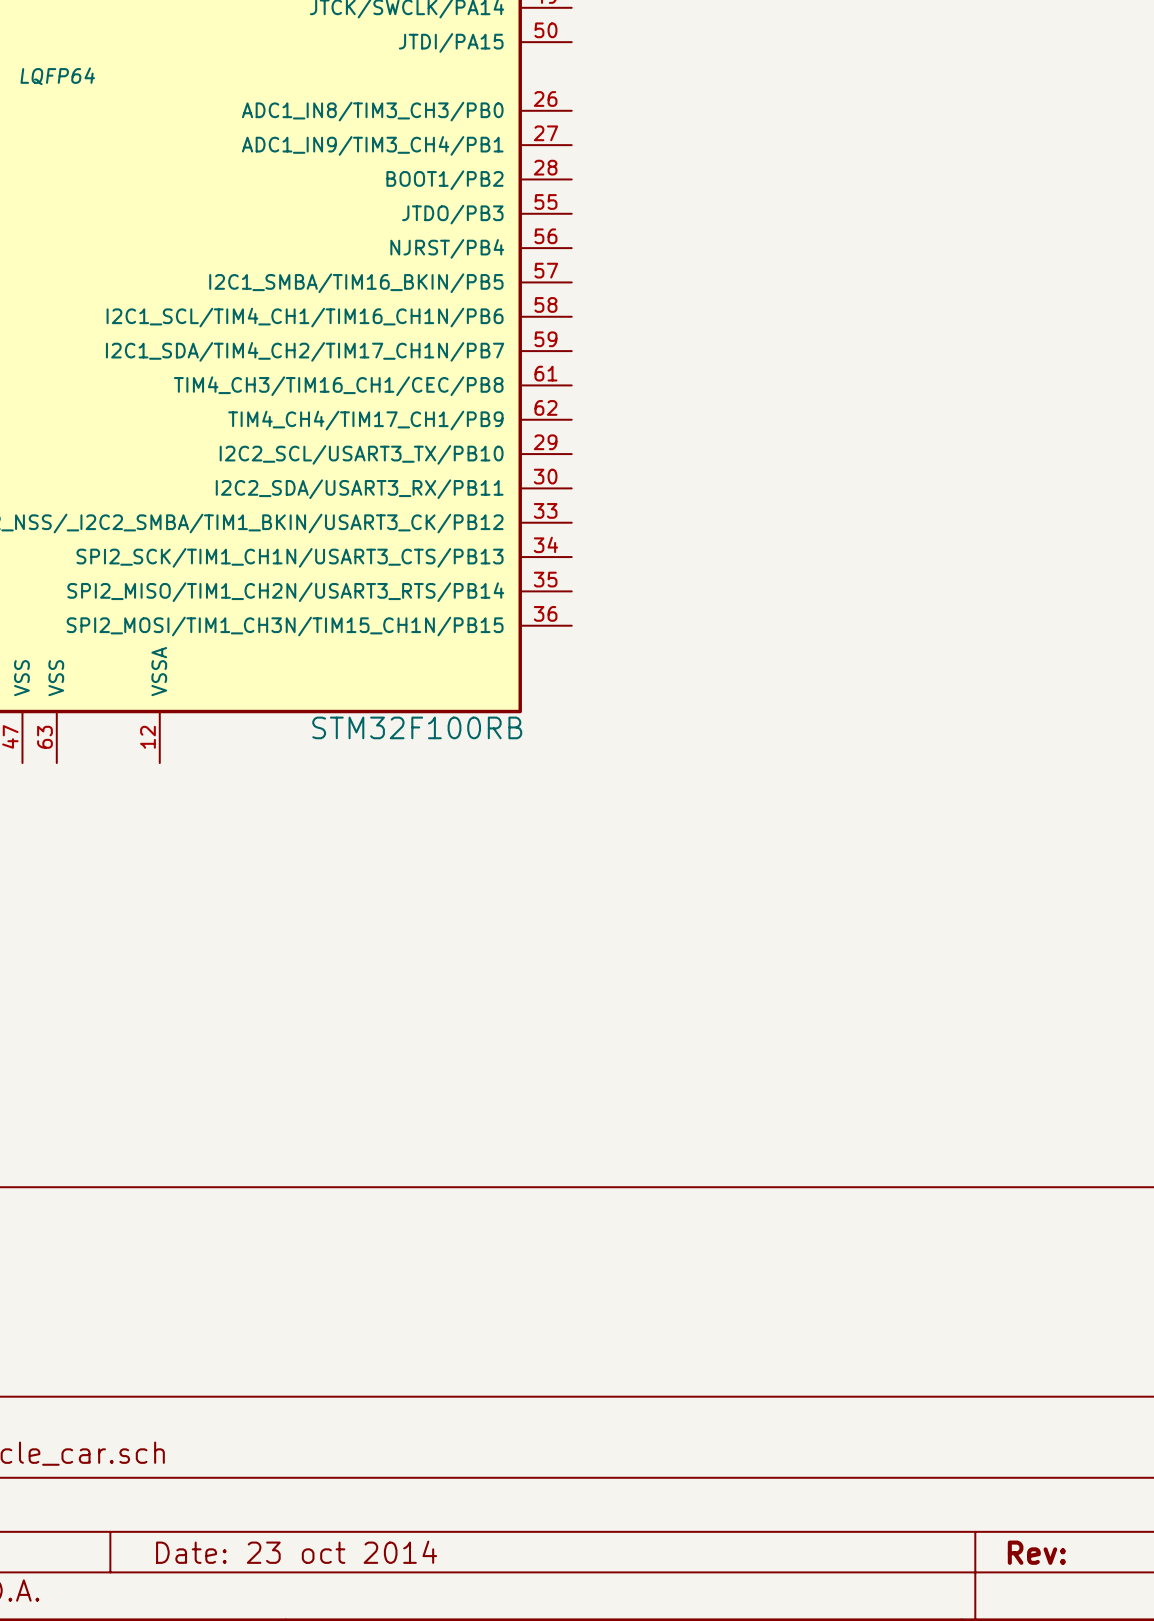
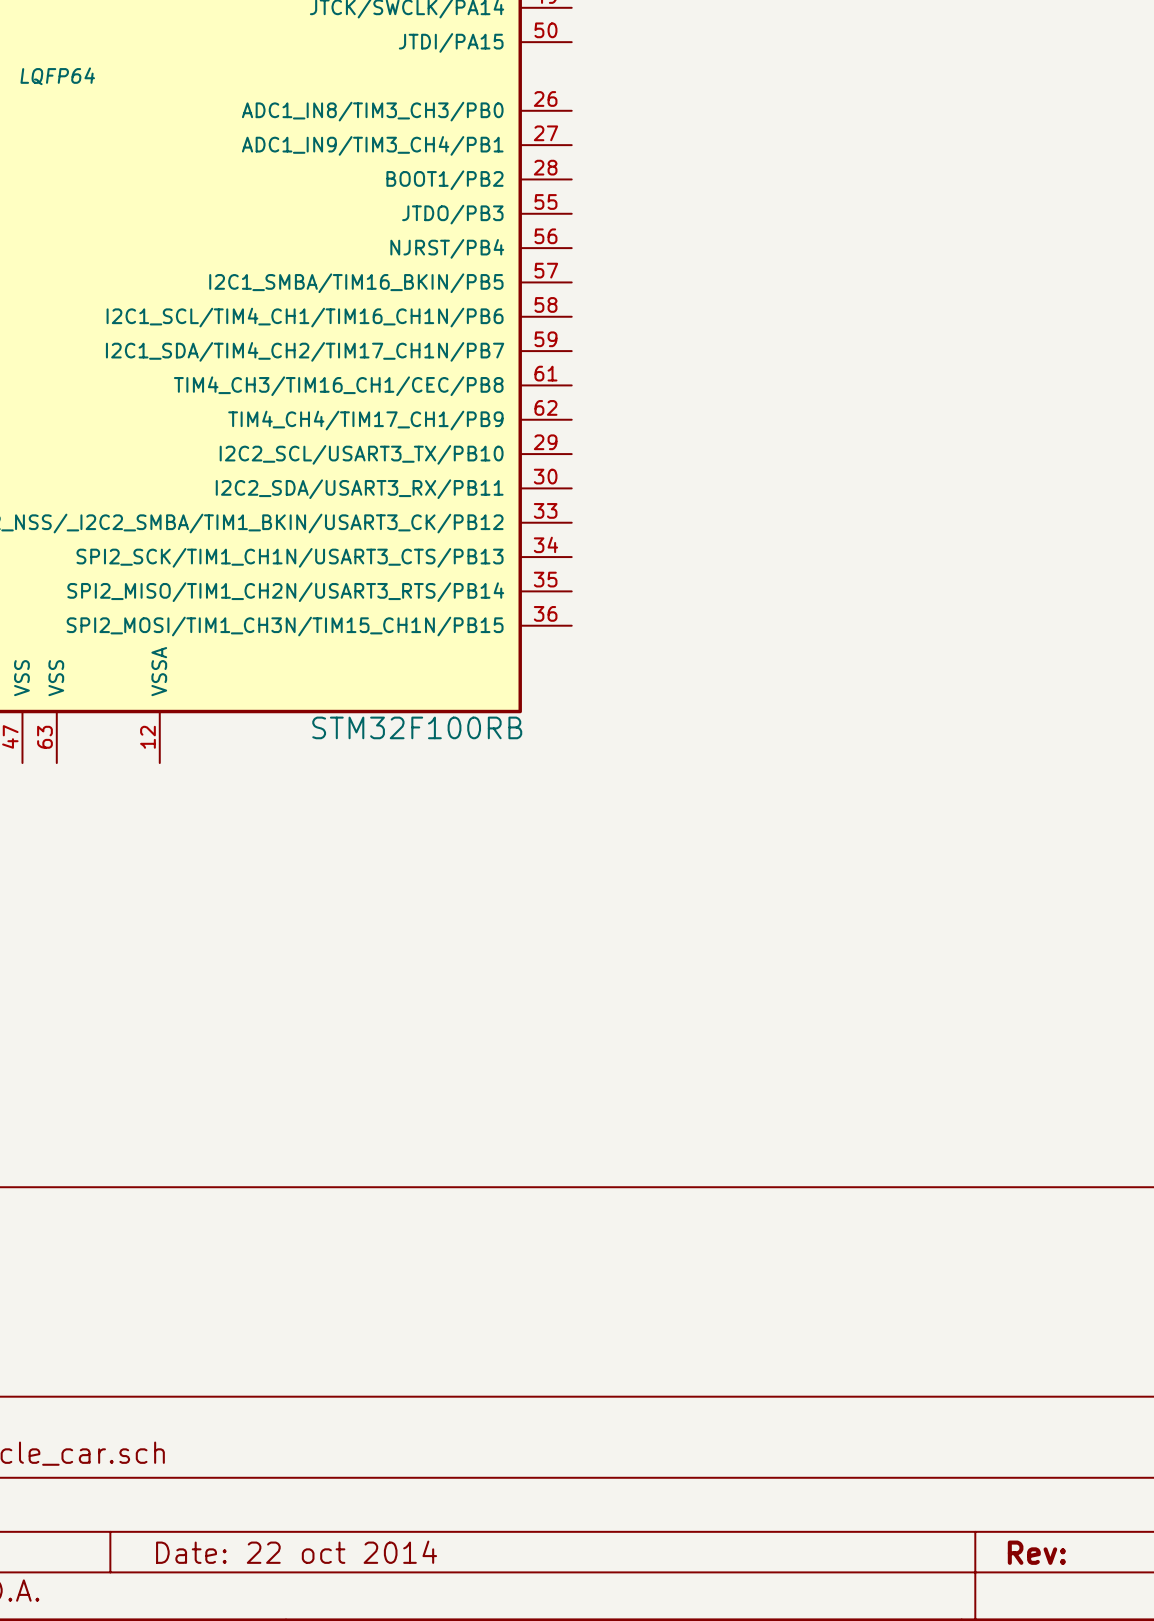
title block: Date: 23 oct 2014 (296, 1552) -> Date: 22 oct 2014 (296, 1552)

